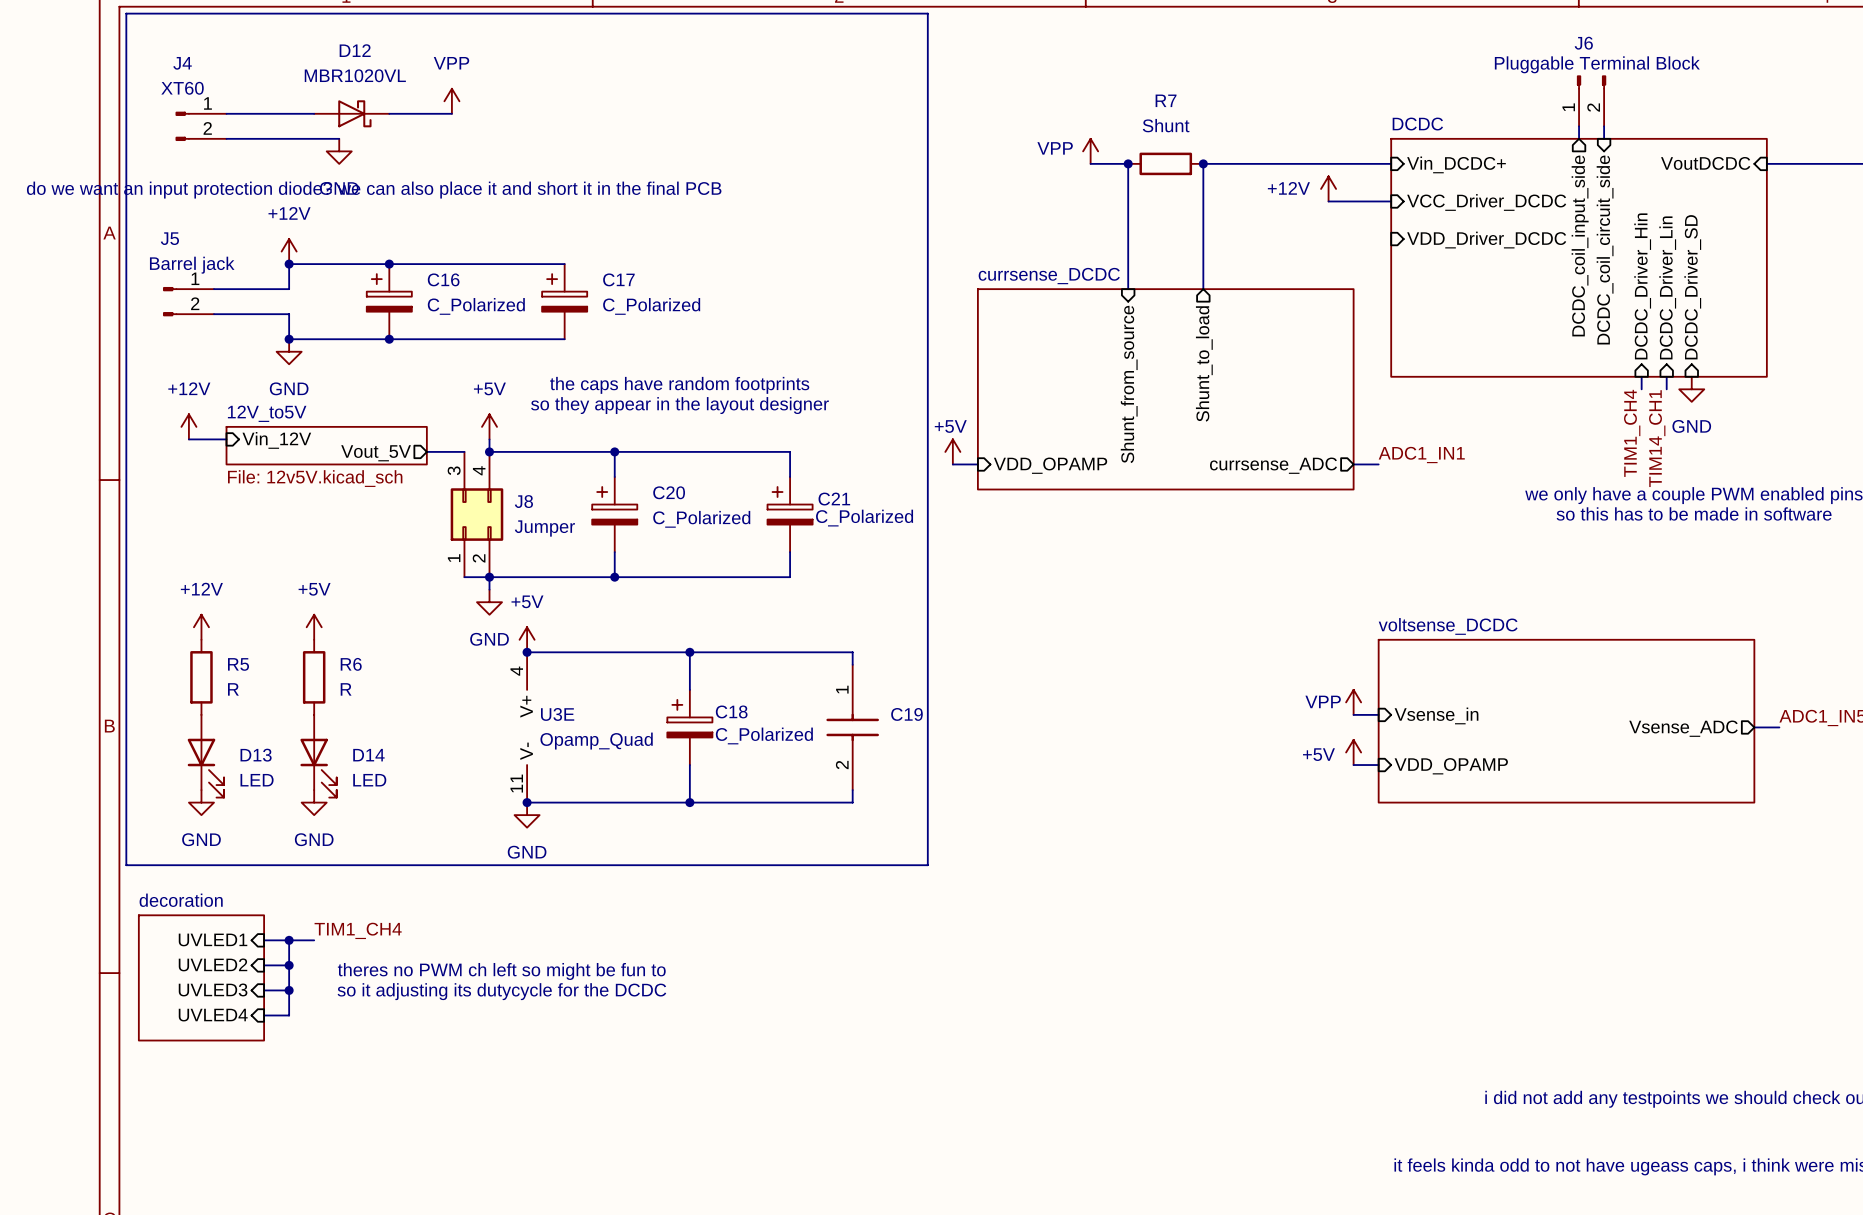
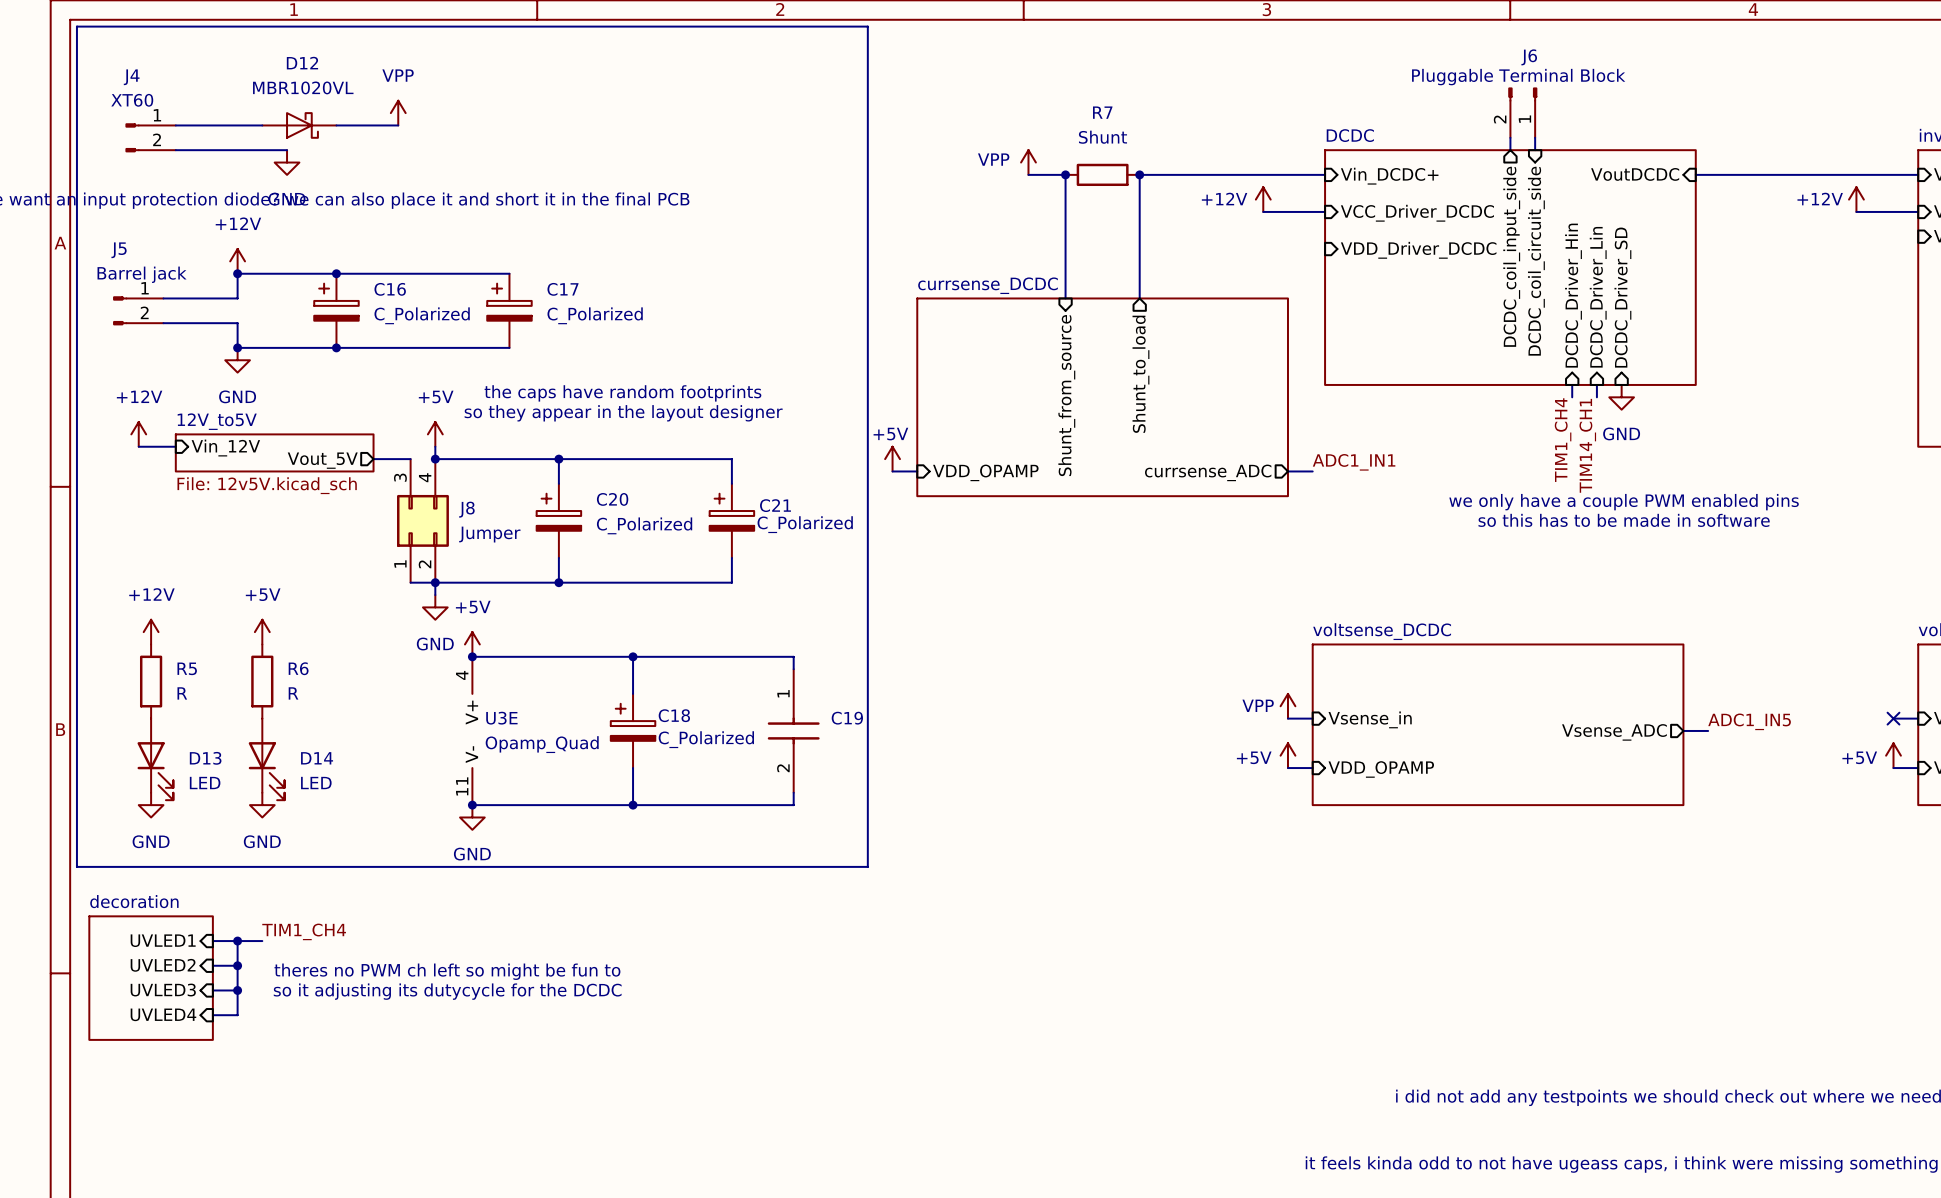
J6 flip: as is (1591, 82) -> left-right (1522, 94)

